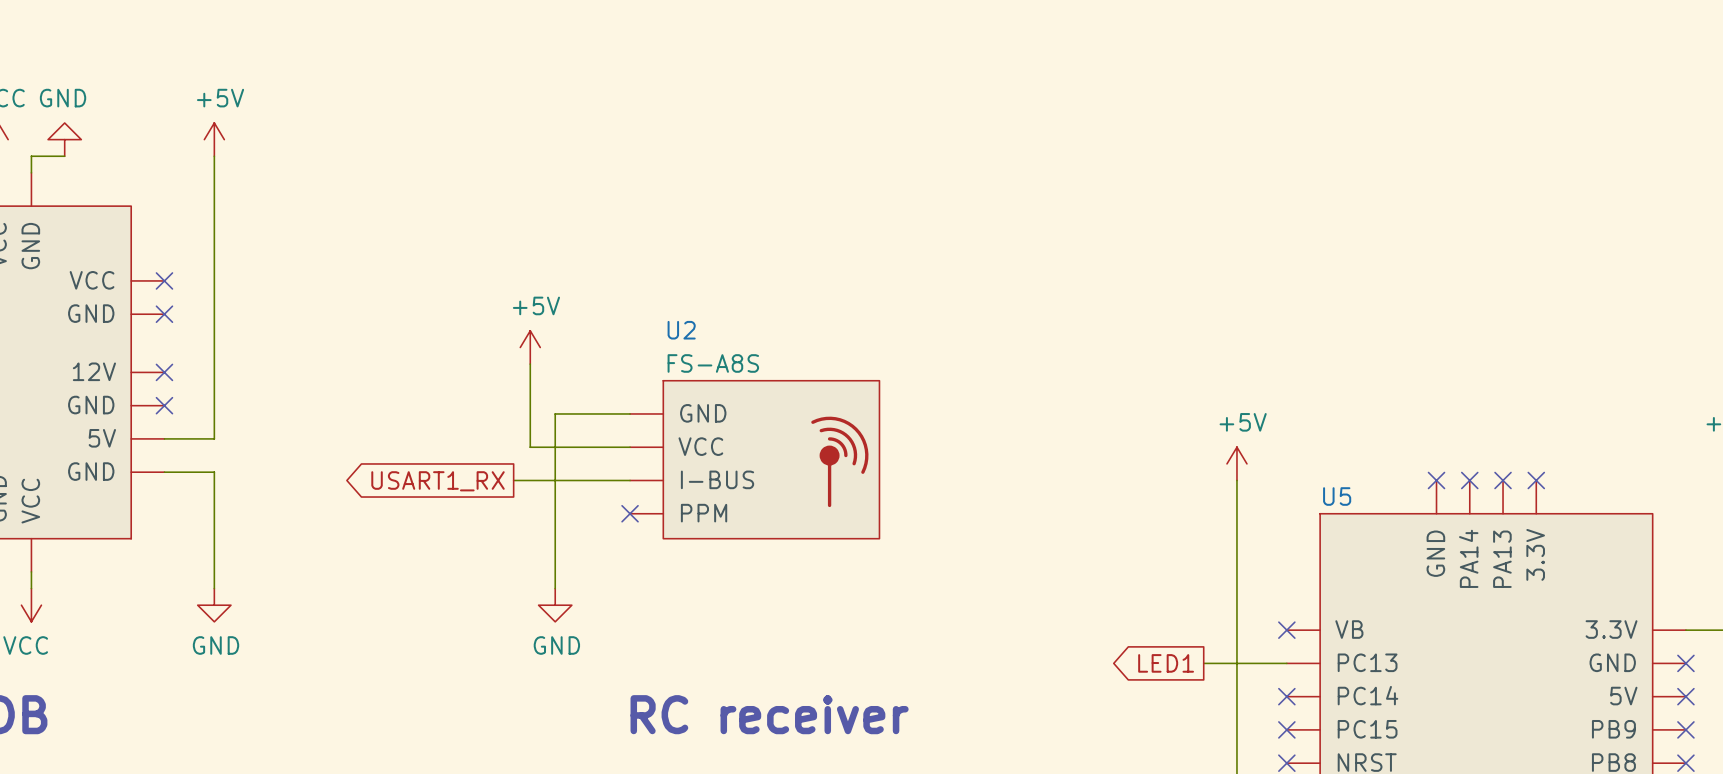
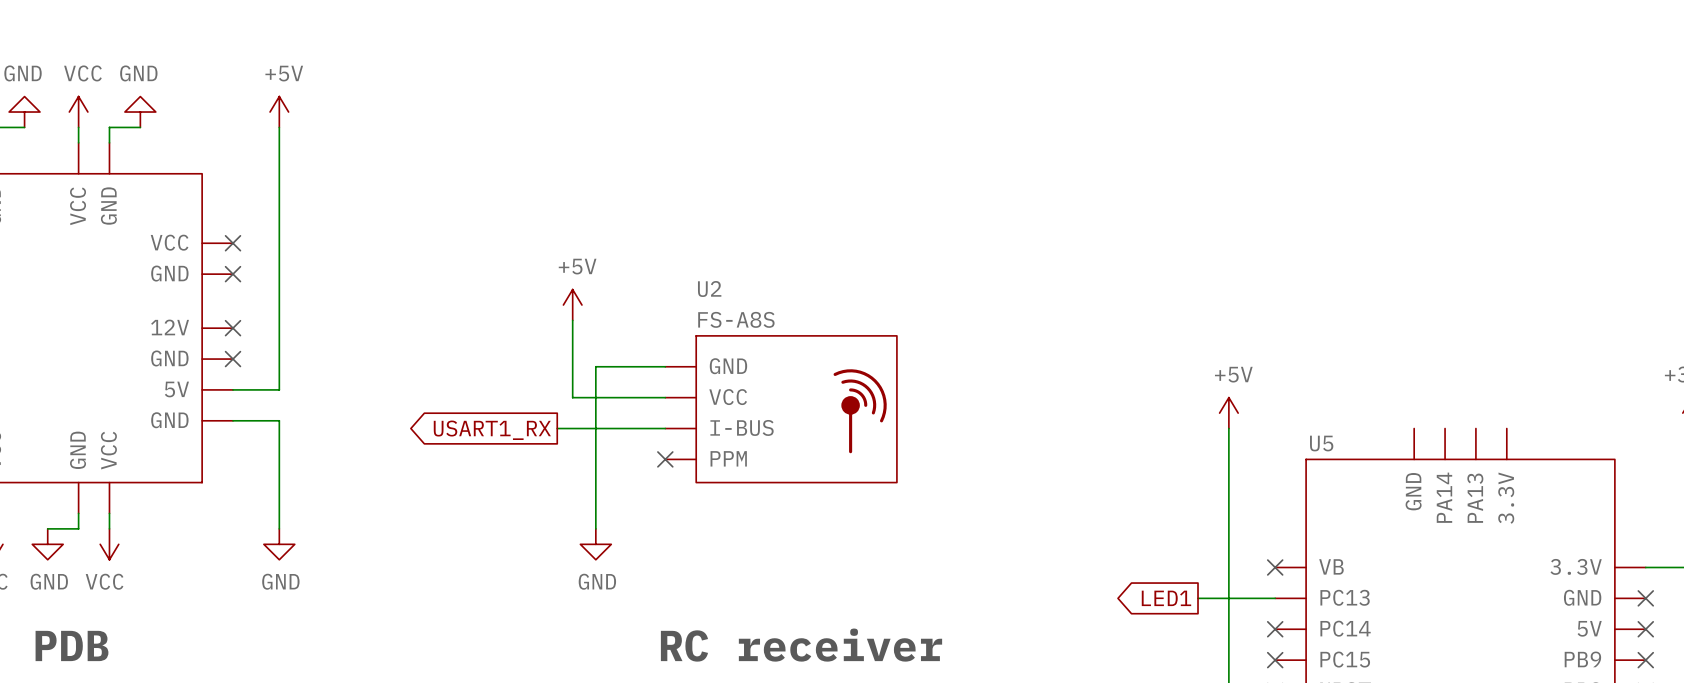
no-connect mark: (1436, 480) -> none
no-connect mark: (1469, 480) -> none
no-connect mark: (1503, 480) -> none
no-connect mark: (1536, 480) -> none

